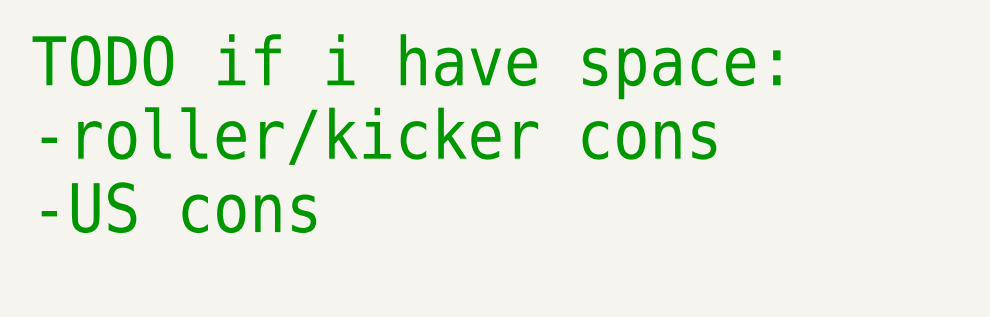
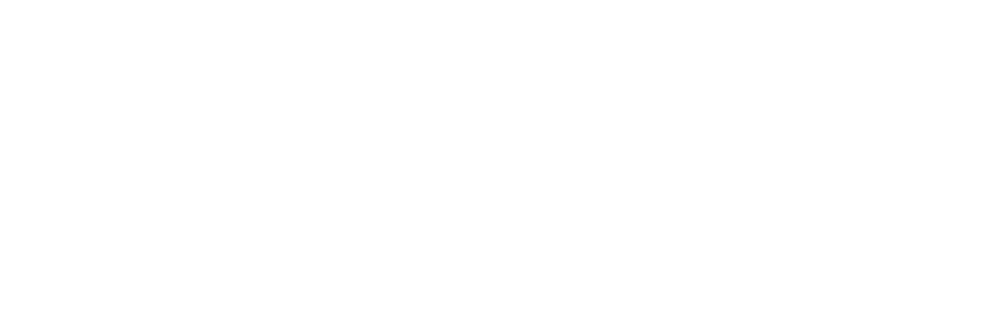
text: TODO if i have space: (406, 66) -> none
text: -roller/kicker cons (379, 136) -> none
text: -US cons (178, 207) -> none

